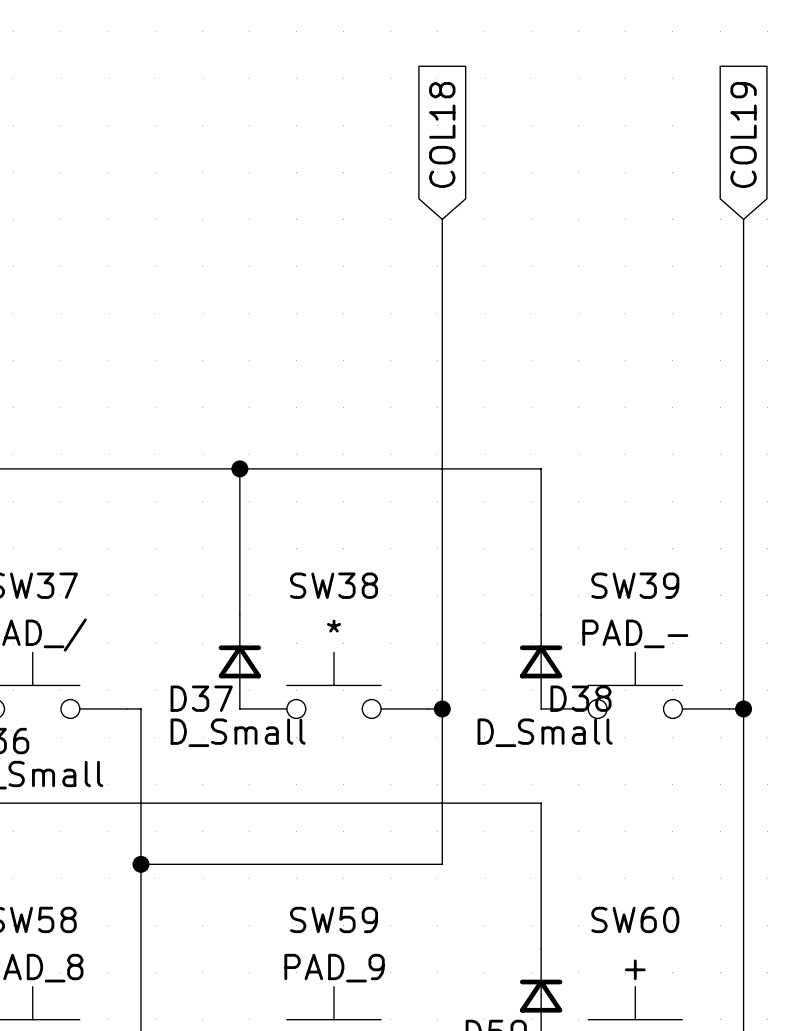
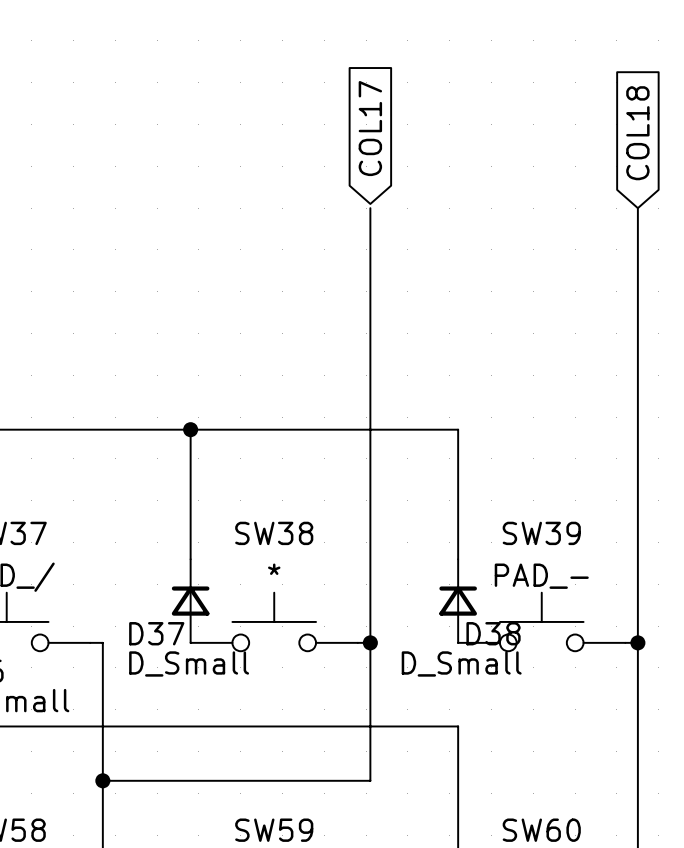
global label: COL18 (442, 135) -> COL17 (370, 128)
global label: COL19 (743, 135) -> COL18 (637, 133)

